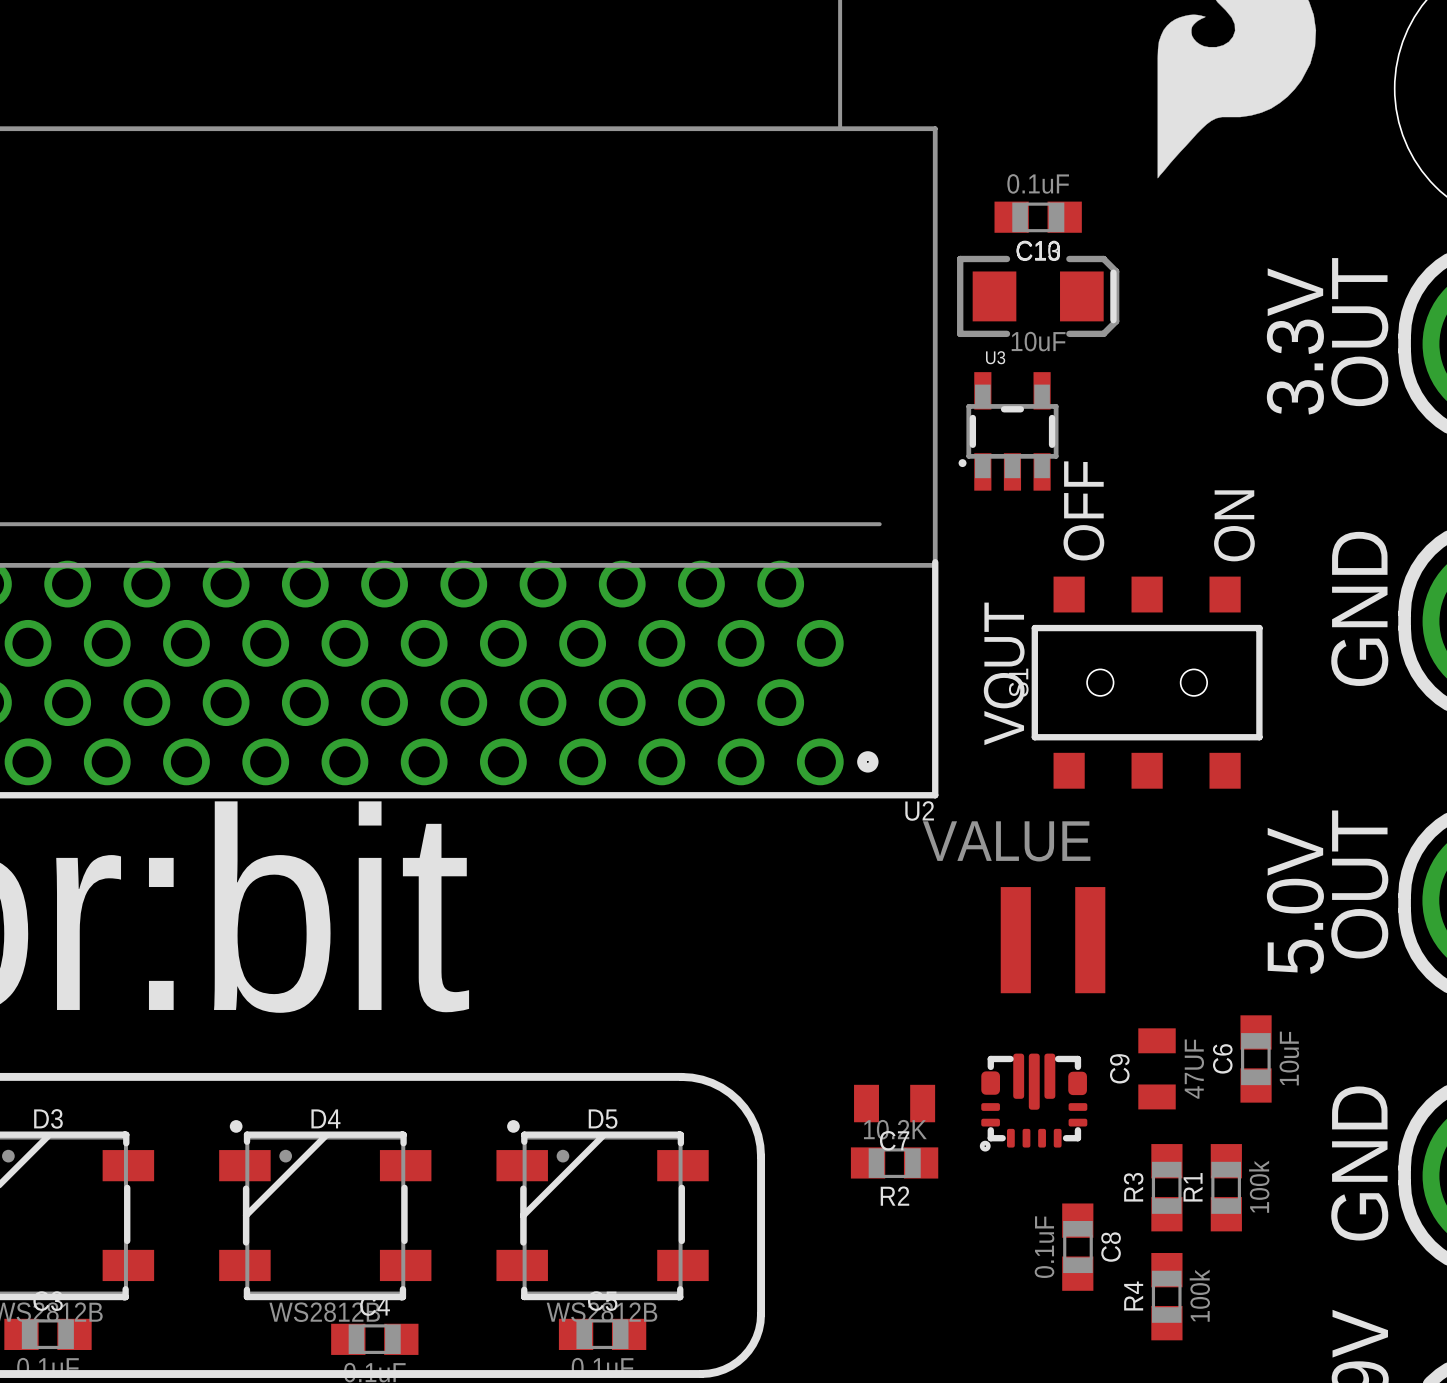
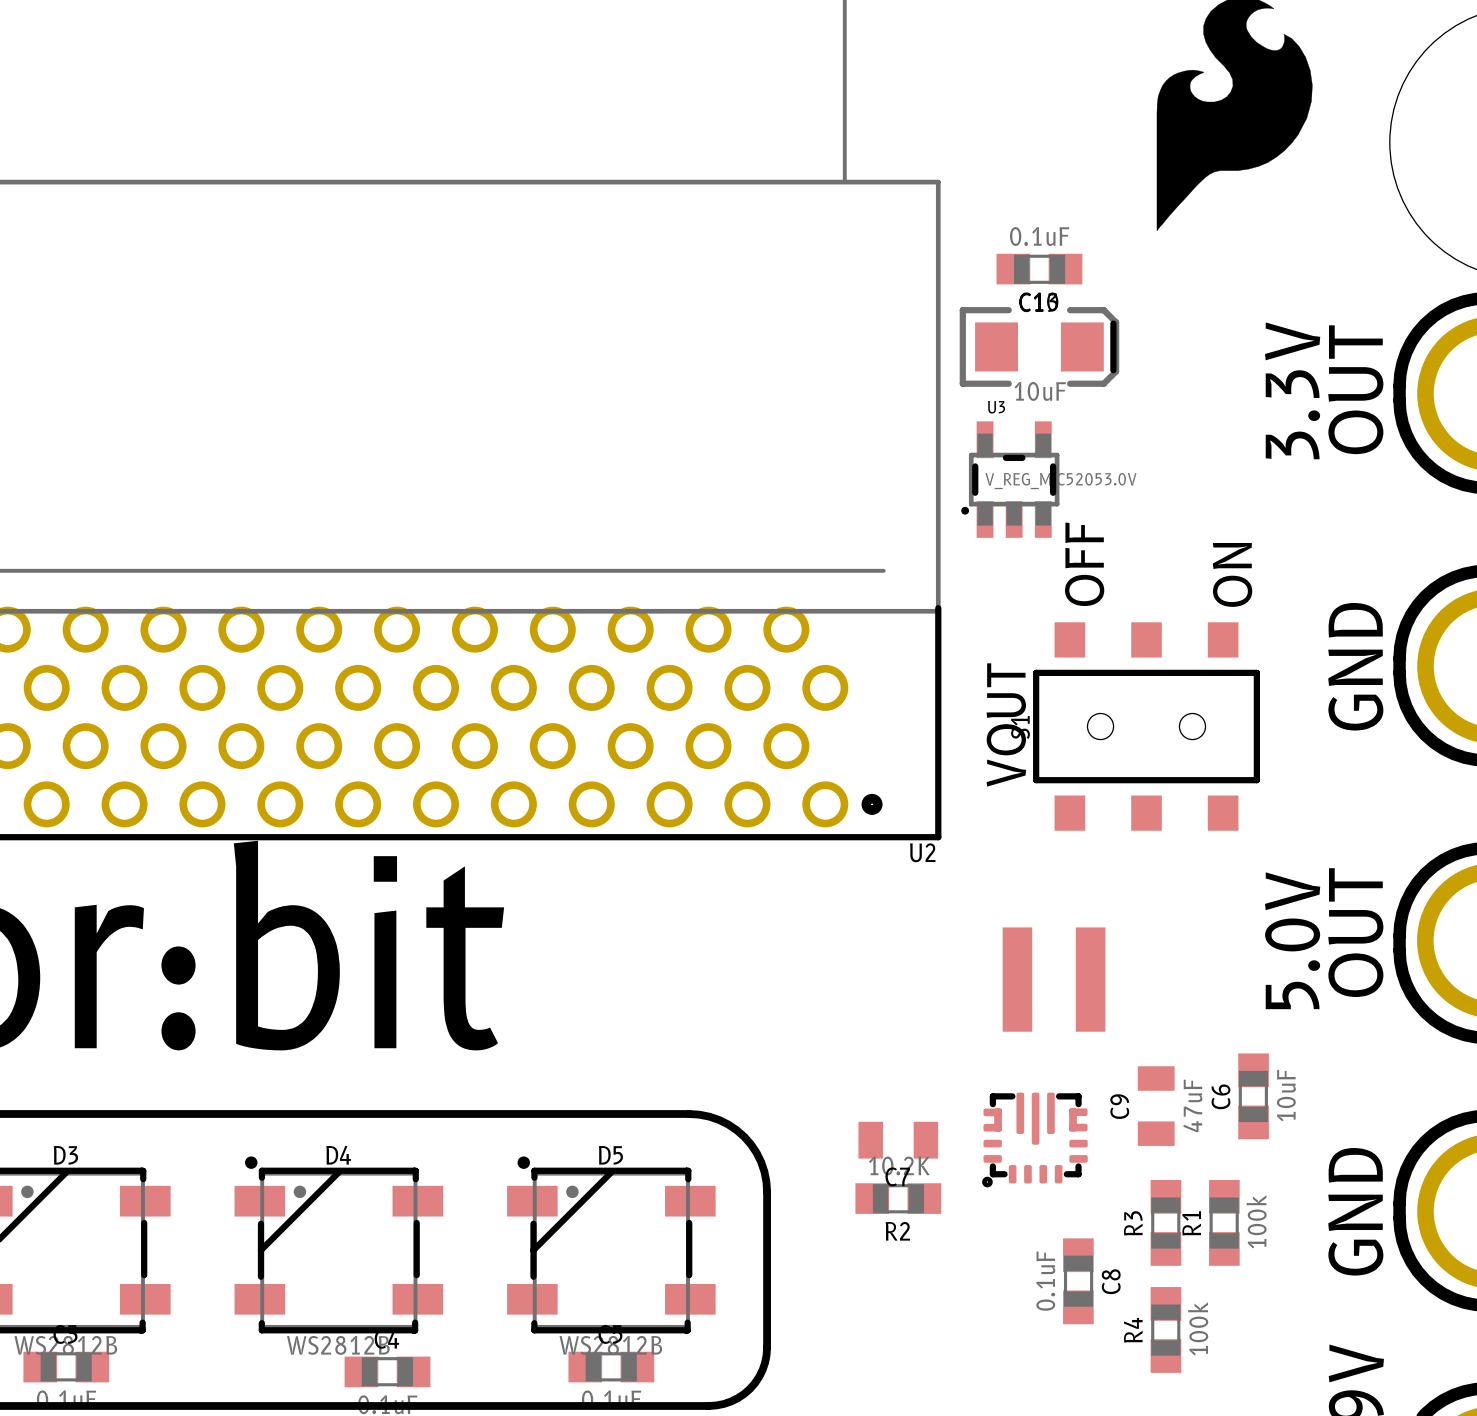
U3 value: none -> V_REG_MIC52053.0V (1060, 481)
part text: VALUE (1006, 841) -> none
part footprint: [979, 1053, 1088, 1152] -> [982, 1092, 1088, 1188]
C9 value: 47UF (1194, 1069) -> 47uF (1192, 1105)

